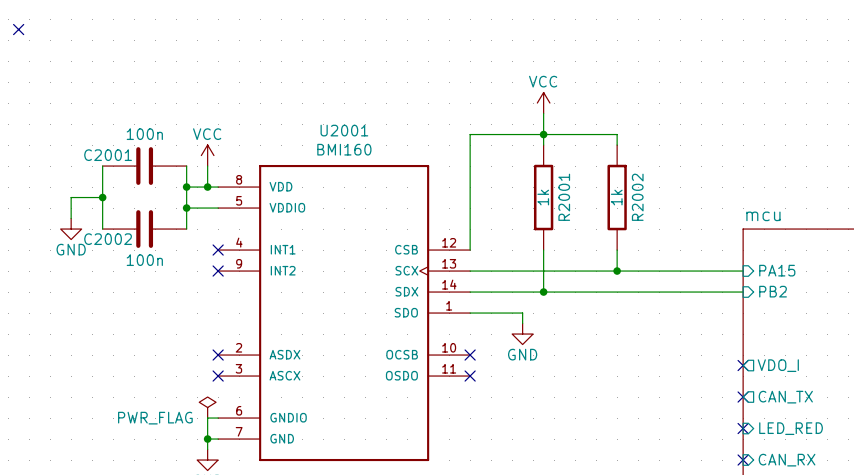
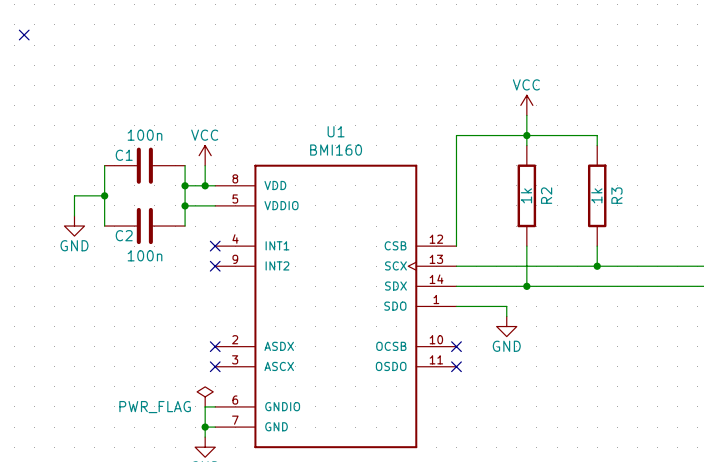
U2001 name: U2001 (344, 130) -> U1 (336, 131)
C2001 name: C2001 (108, 155) -> C1 (124, 155)
R2001 name: R2001 (564, 197) -> R2 (546, 195)
R2002 name: R2002 (637, 197) -> R3 (616, 195)
C2002 name: C2002 (108, 239) -> C2 (124, 235)

